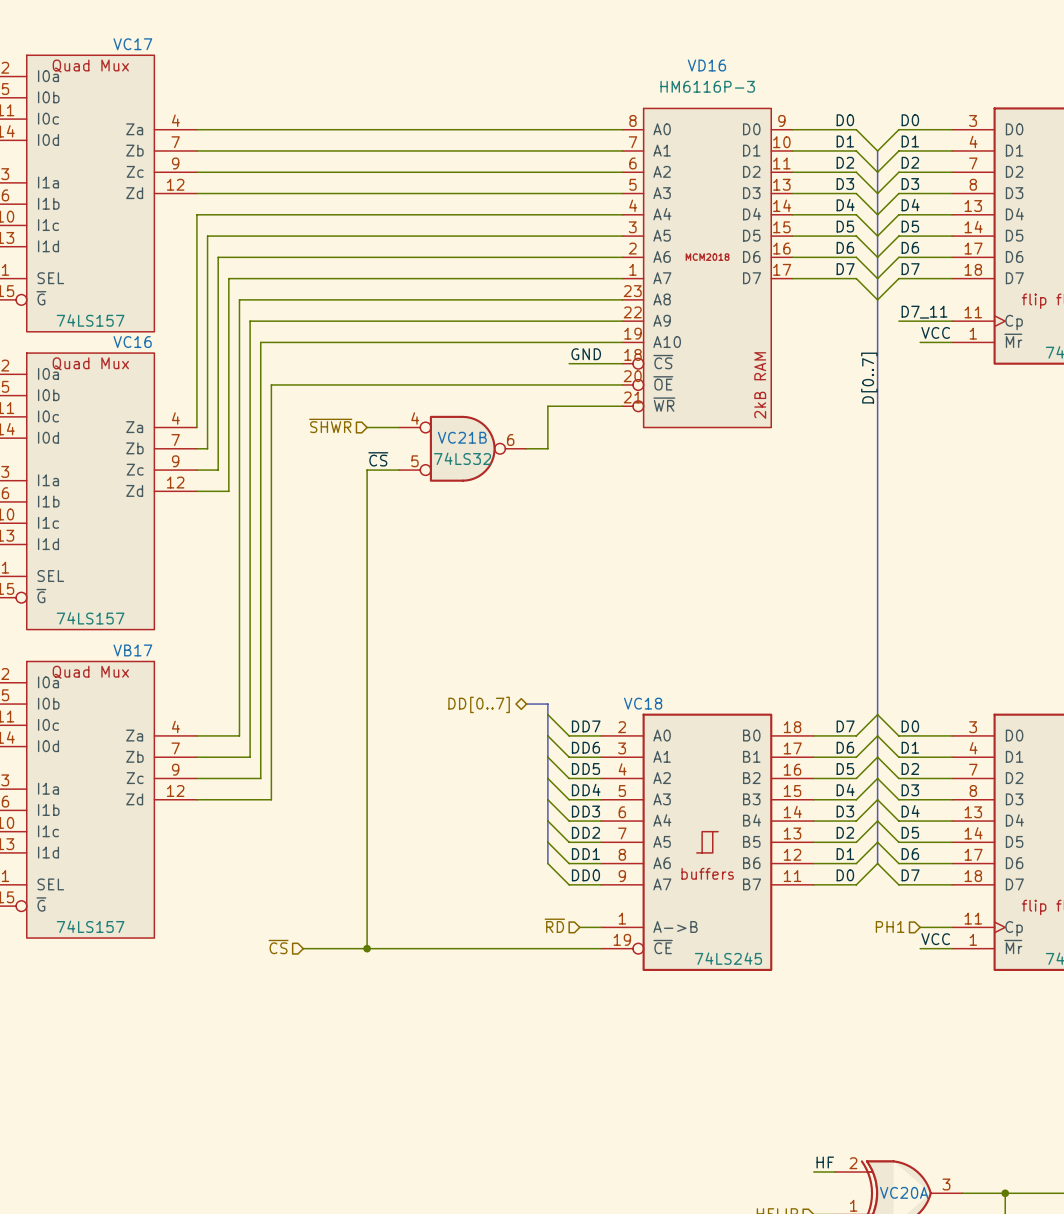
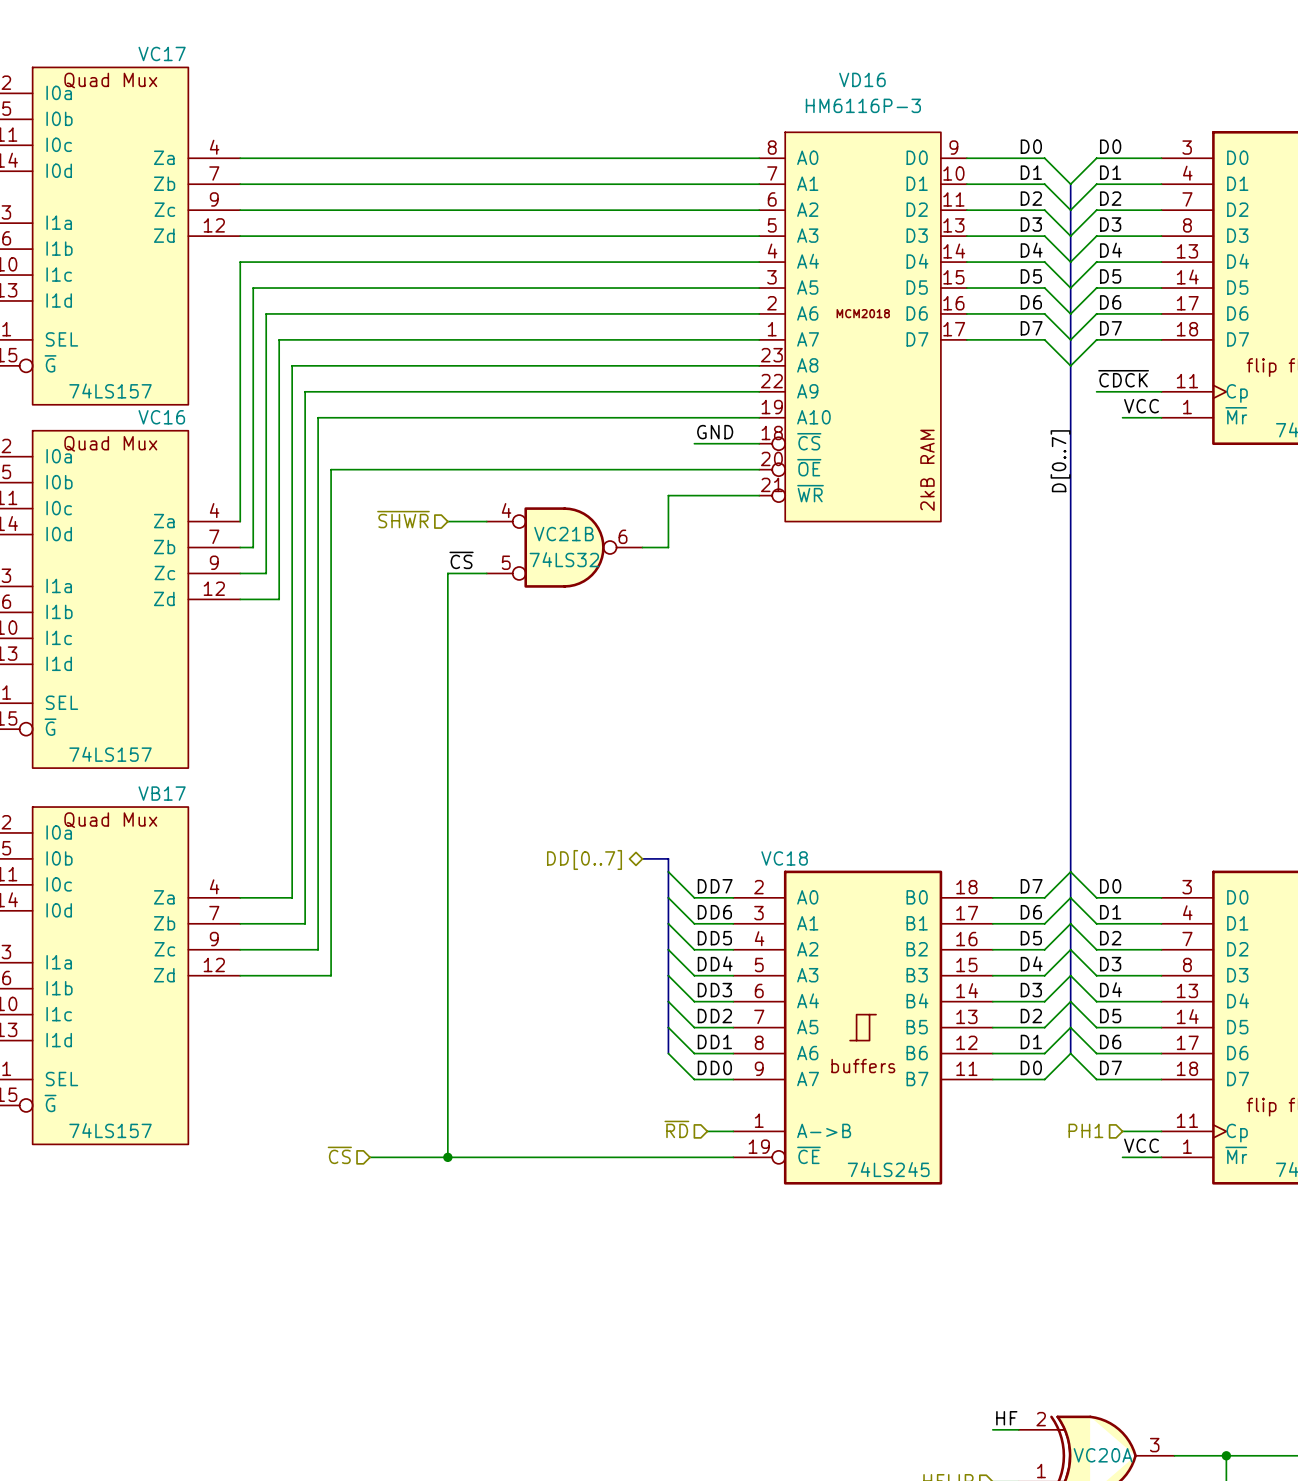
label: D7_11 (924, 312) -> ~{CDCK} (1123, 378)

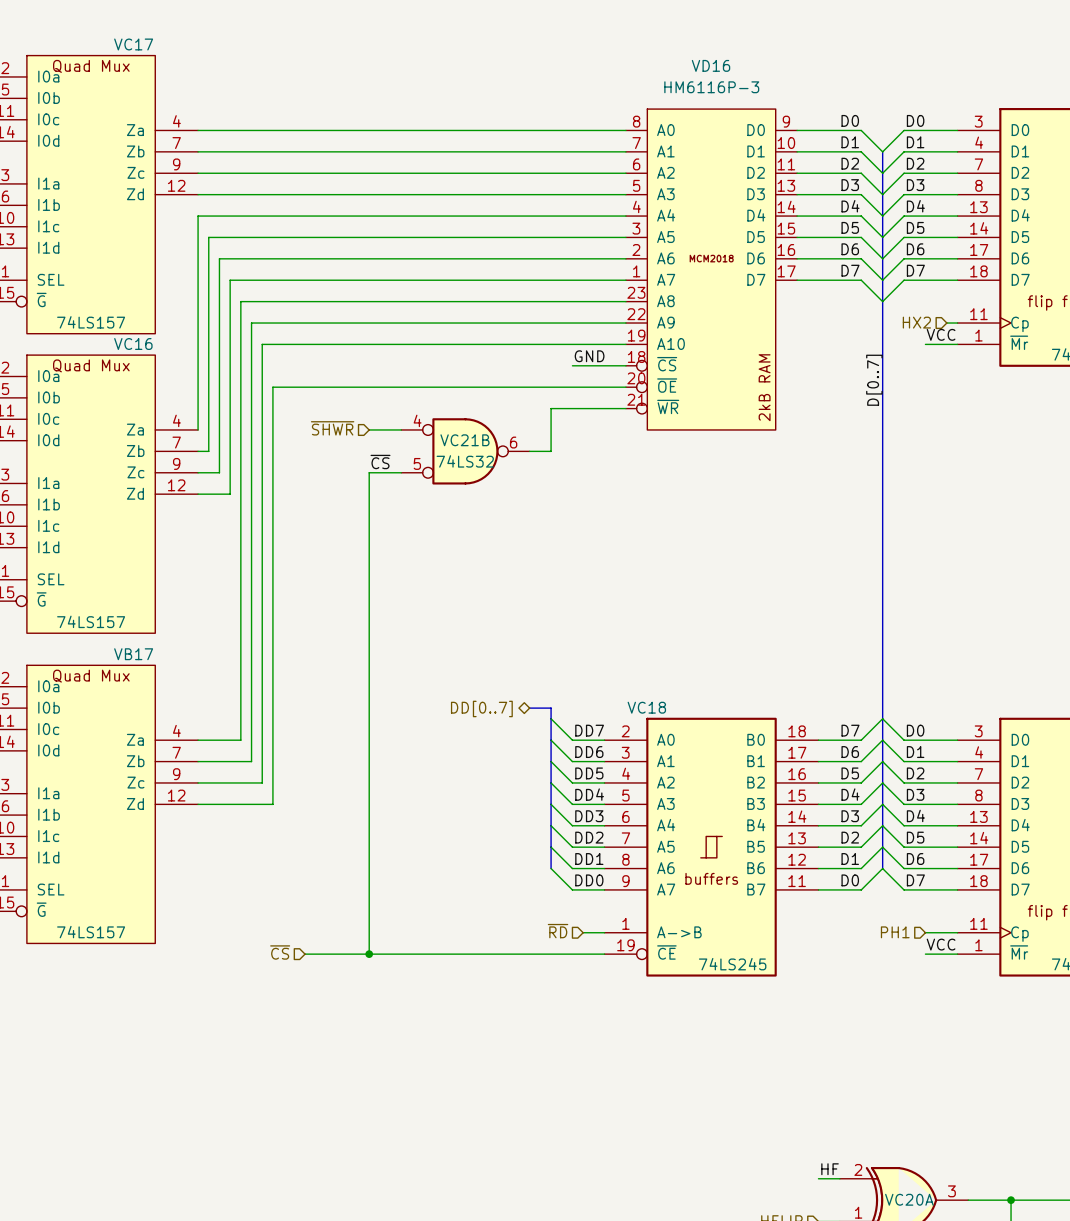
label: ~{CDCK} (1123, 378) -> none
wire: (1096, 391) (1148, 391) -> none
hierarchical label: none -> HX2 (916, 322)

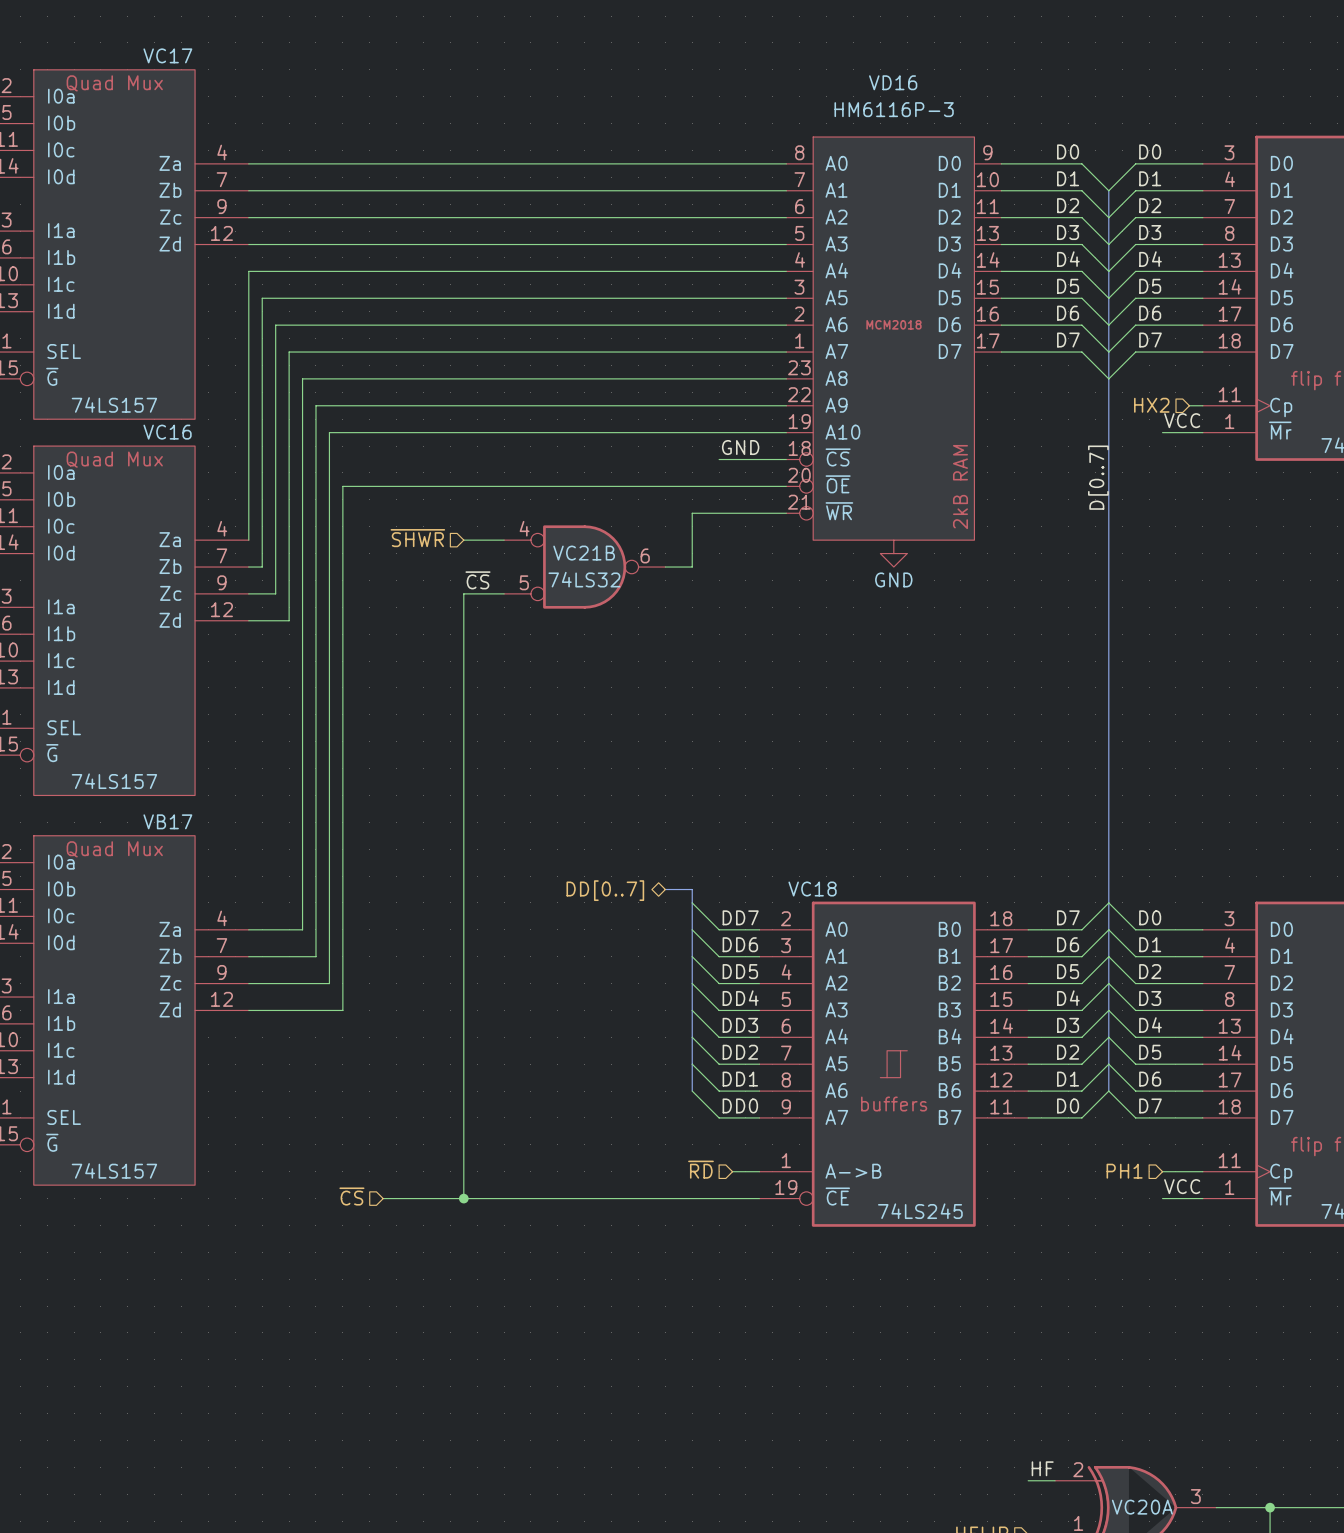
power symbol: none -> GND (893, 553)

